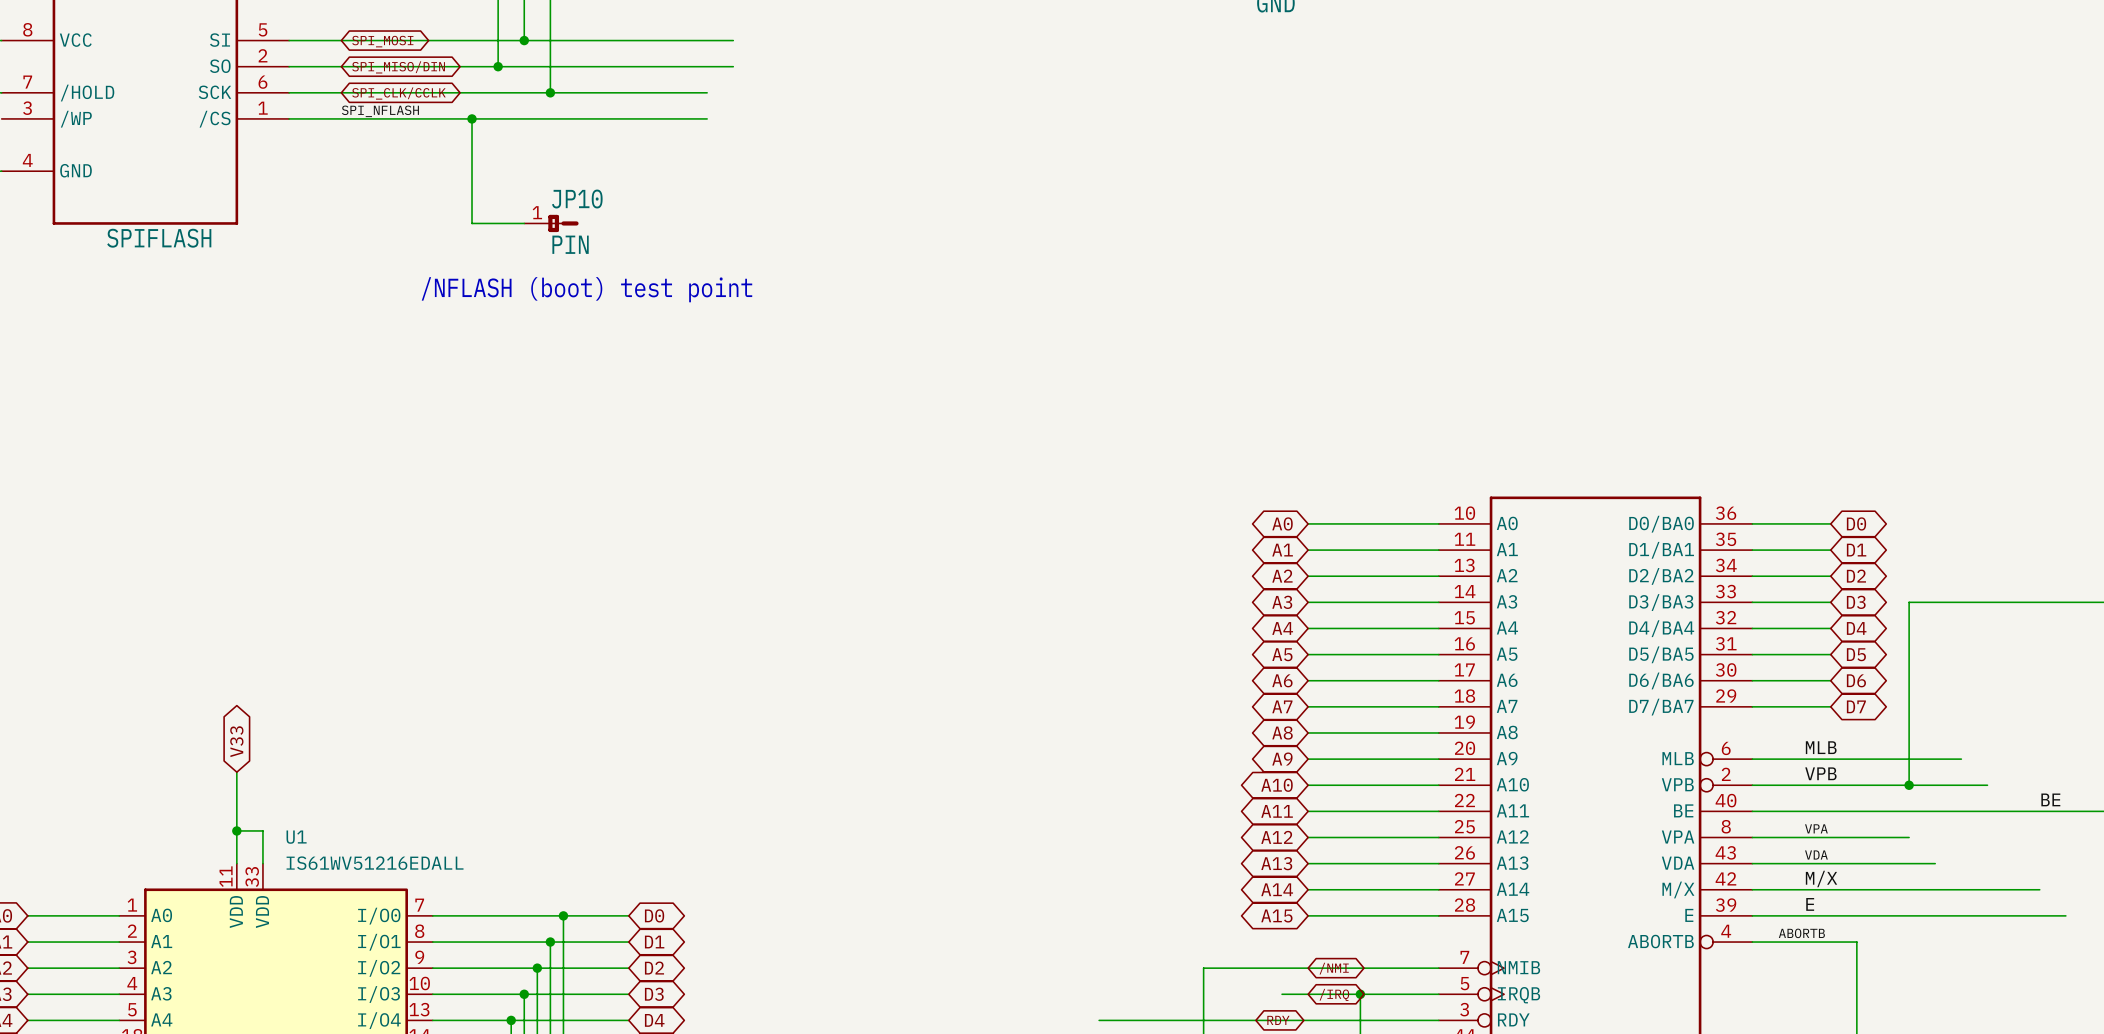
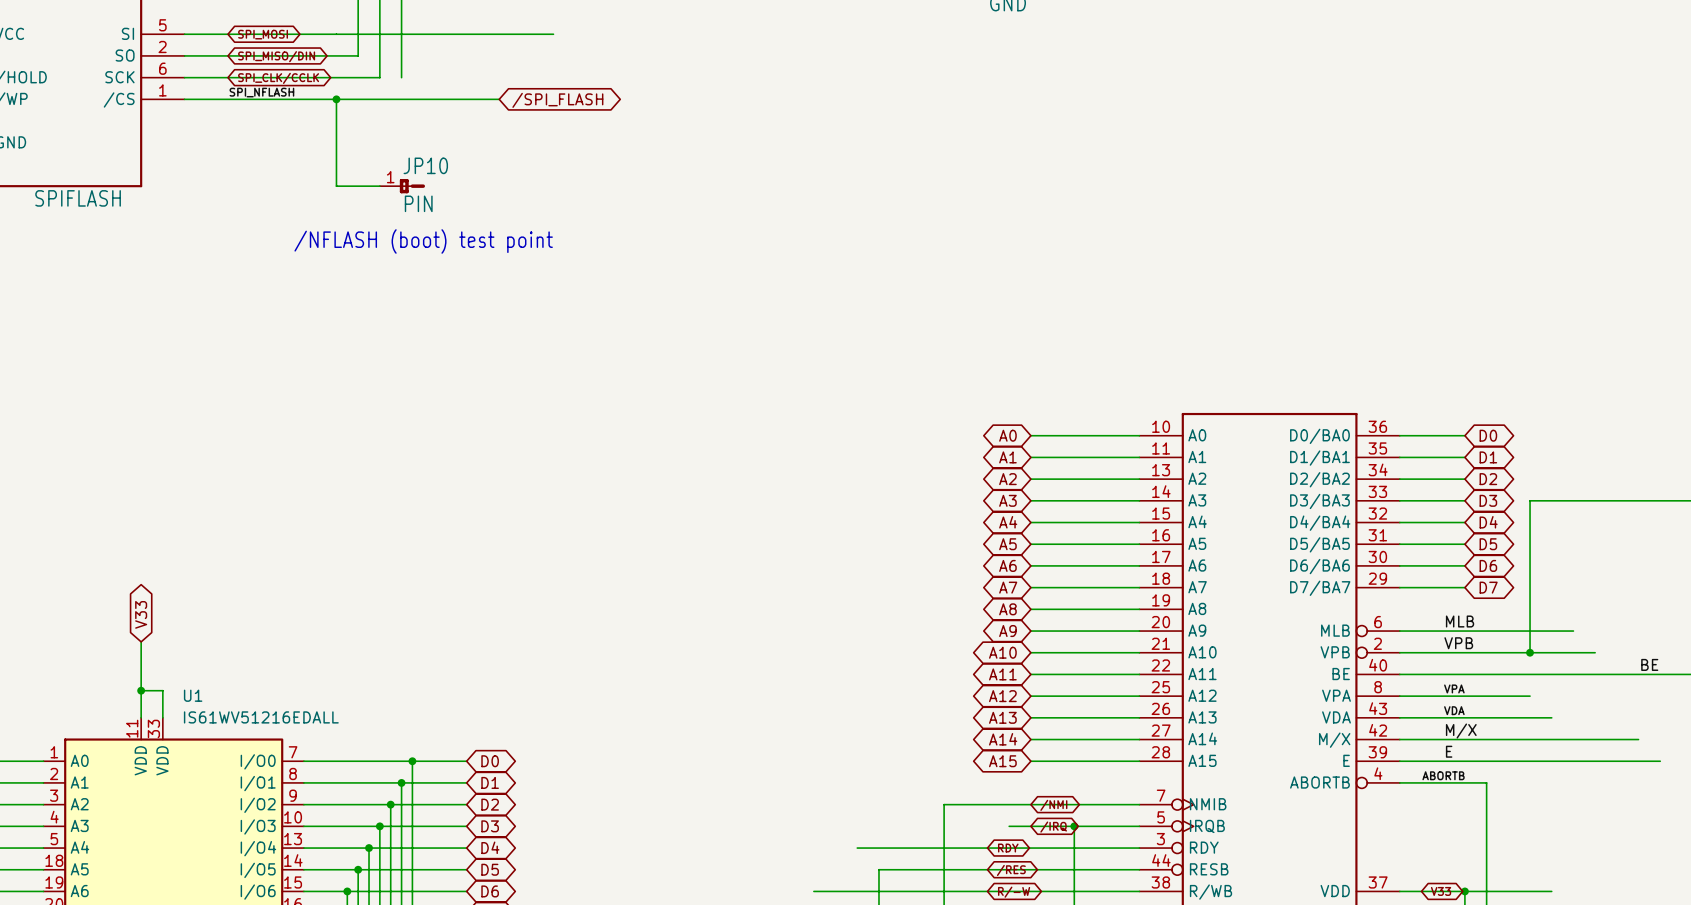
junction: (524, 40) -> none
wire: (498, 66) (733, 66) -> none
junction: (498, 66) -> none
wire: (524, 92) (707, 92) -> (379, 77) (379, 34)
junction: (550, 92) -> none
wire: (667, 118) (707, 118) -> none
global label: none -> /SPI_FLASH (557, 100)

